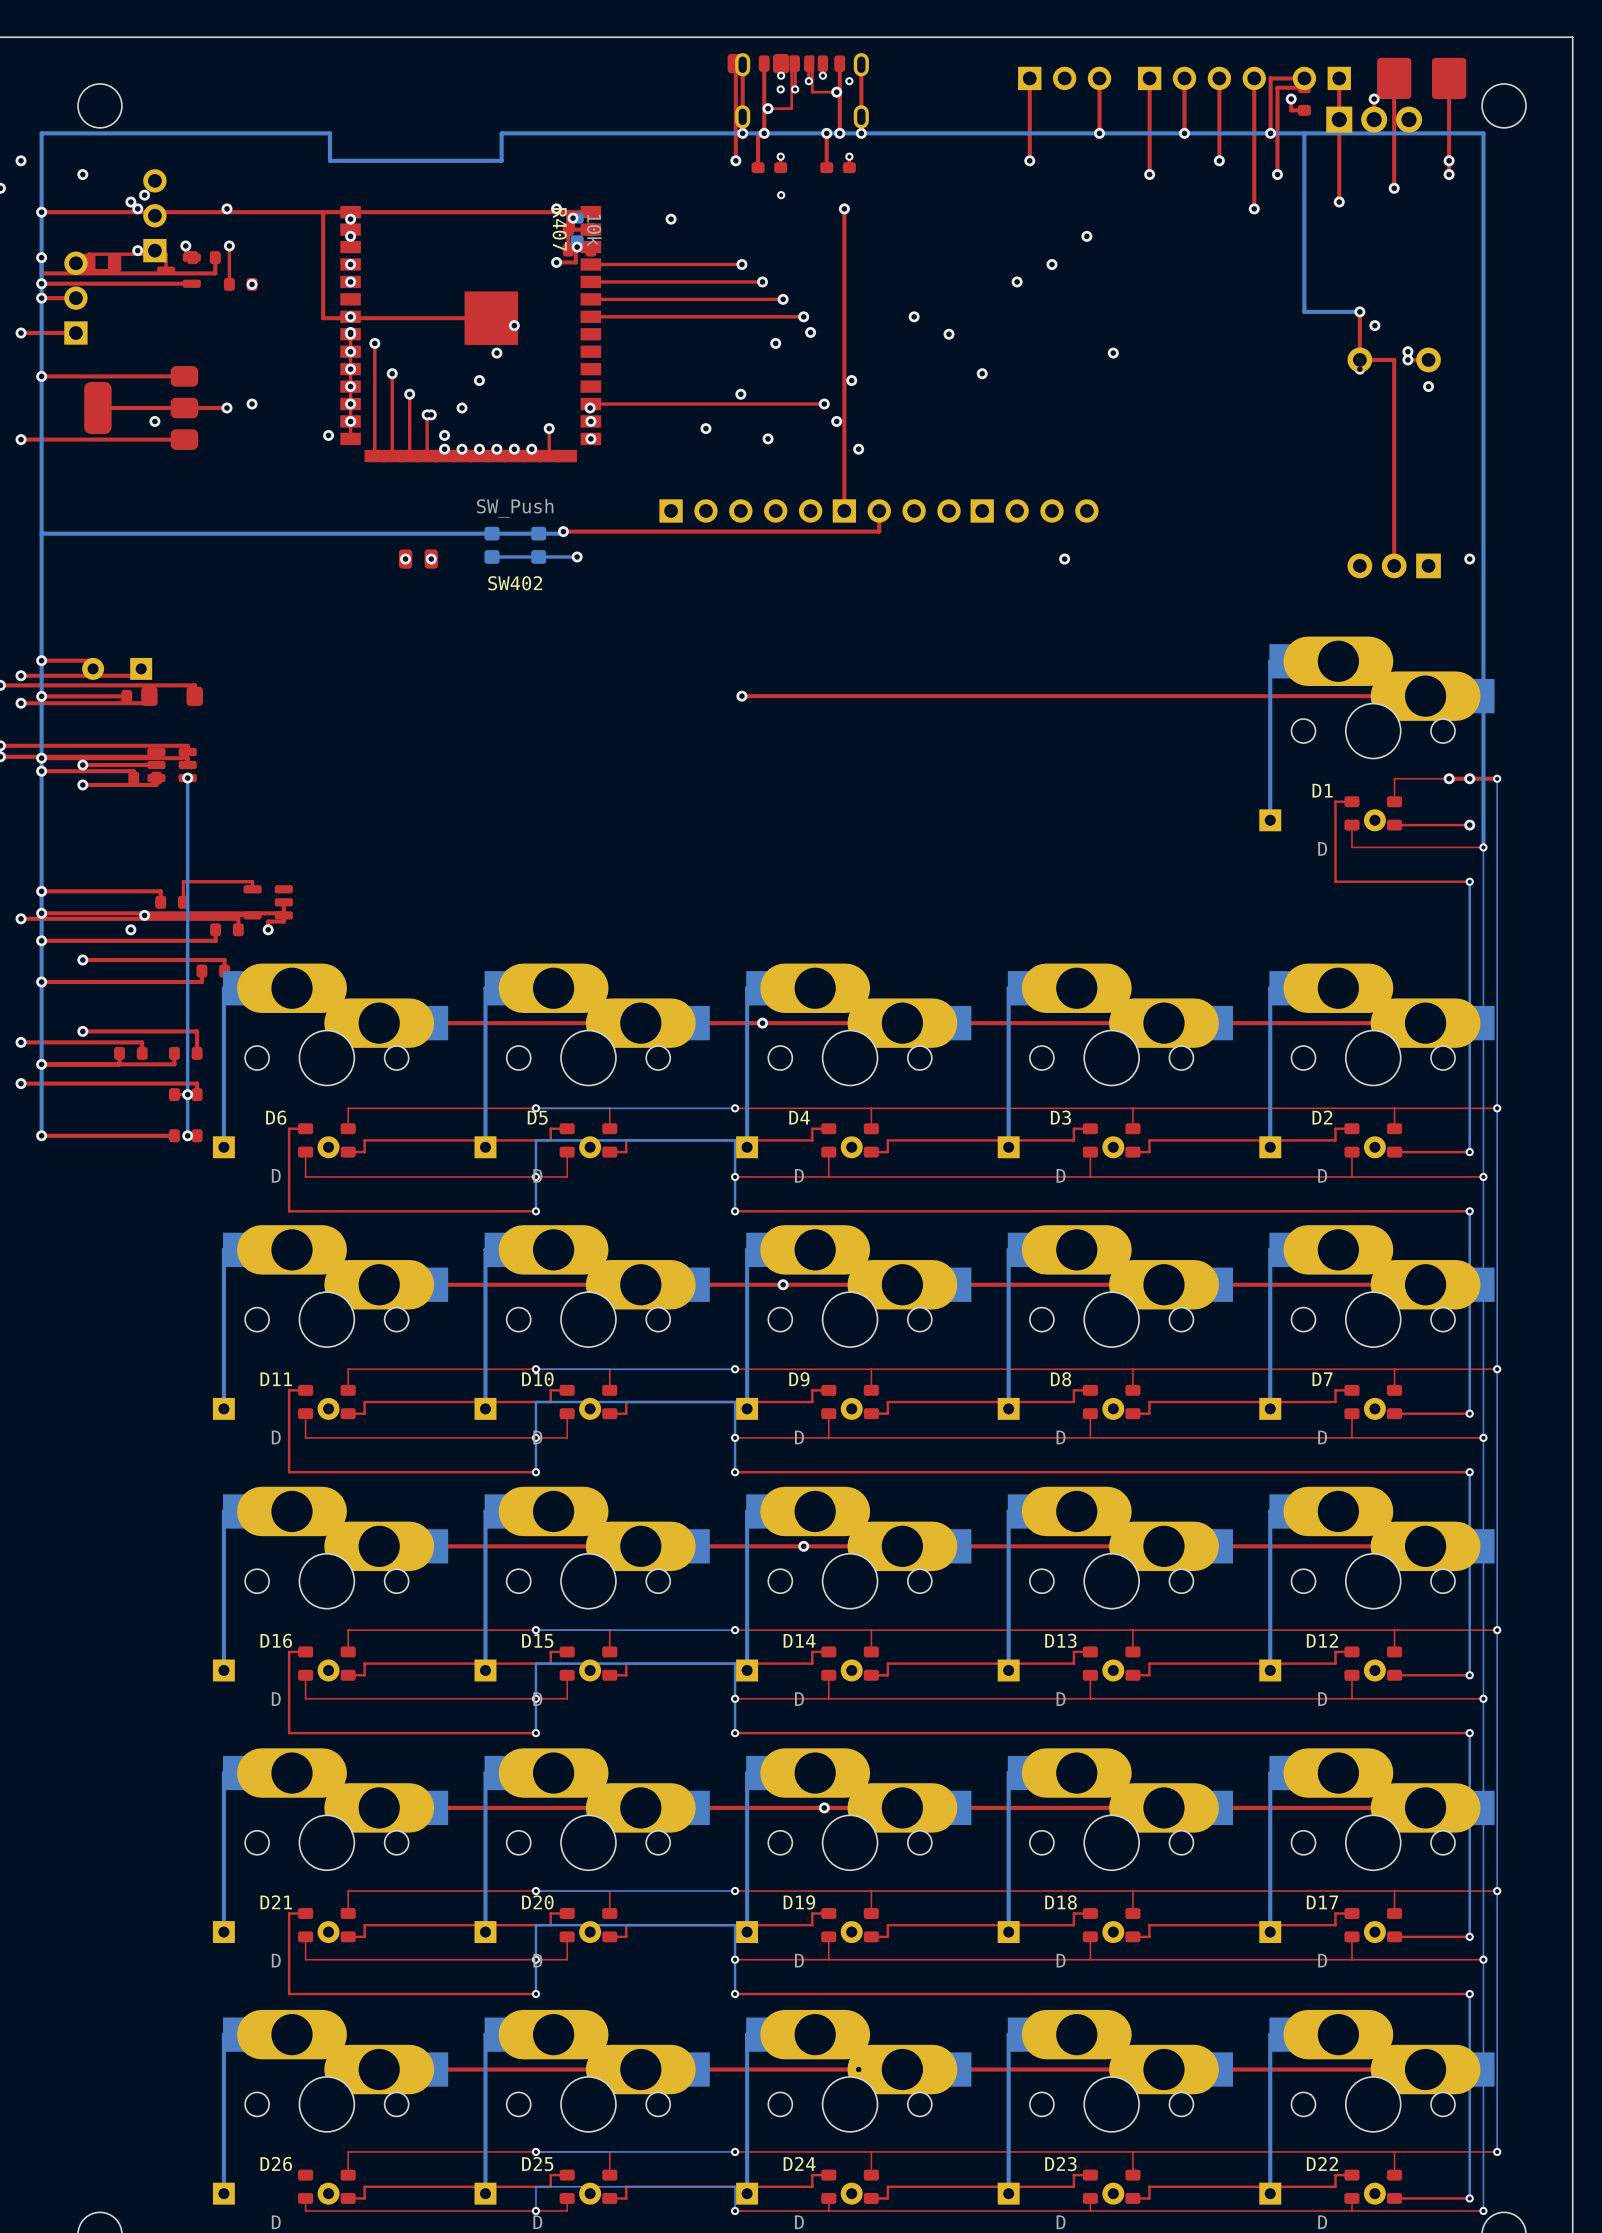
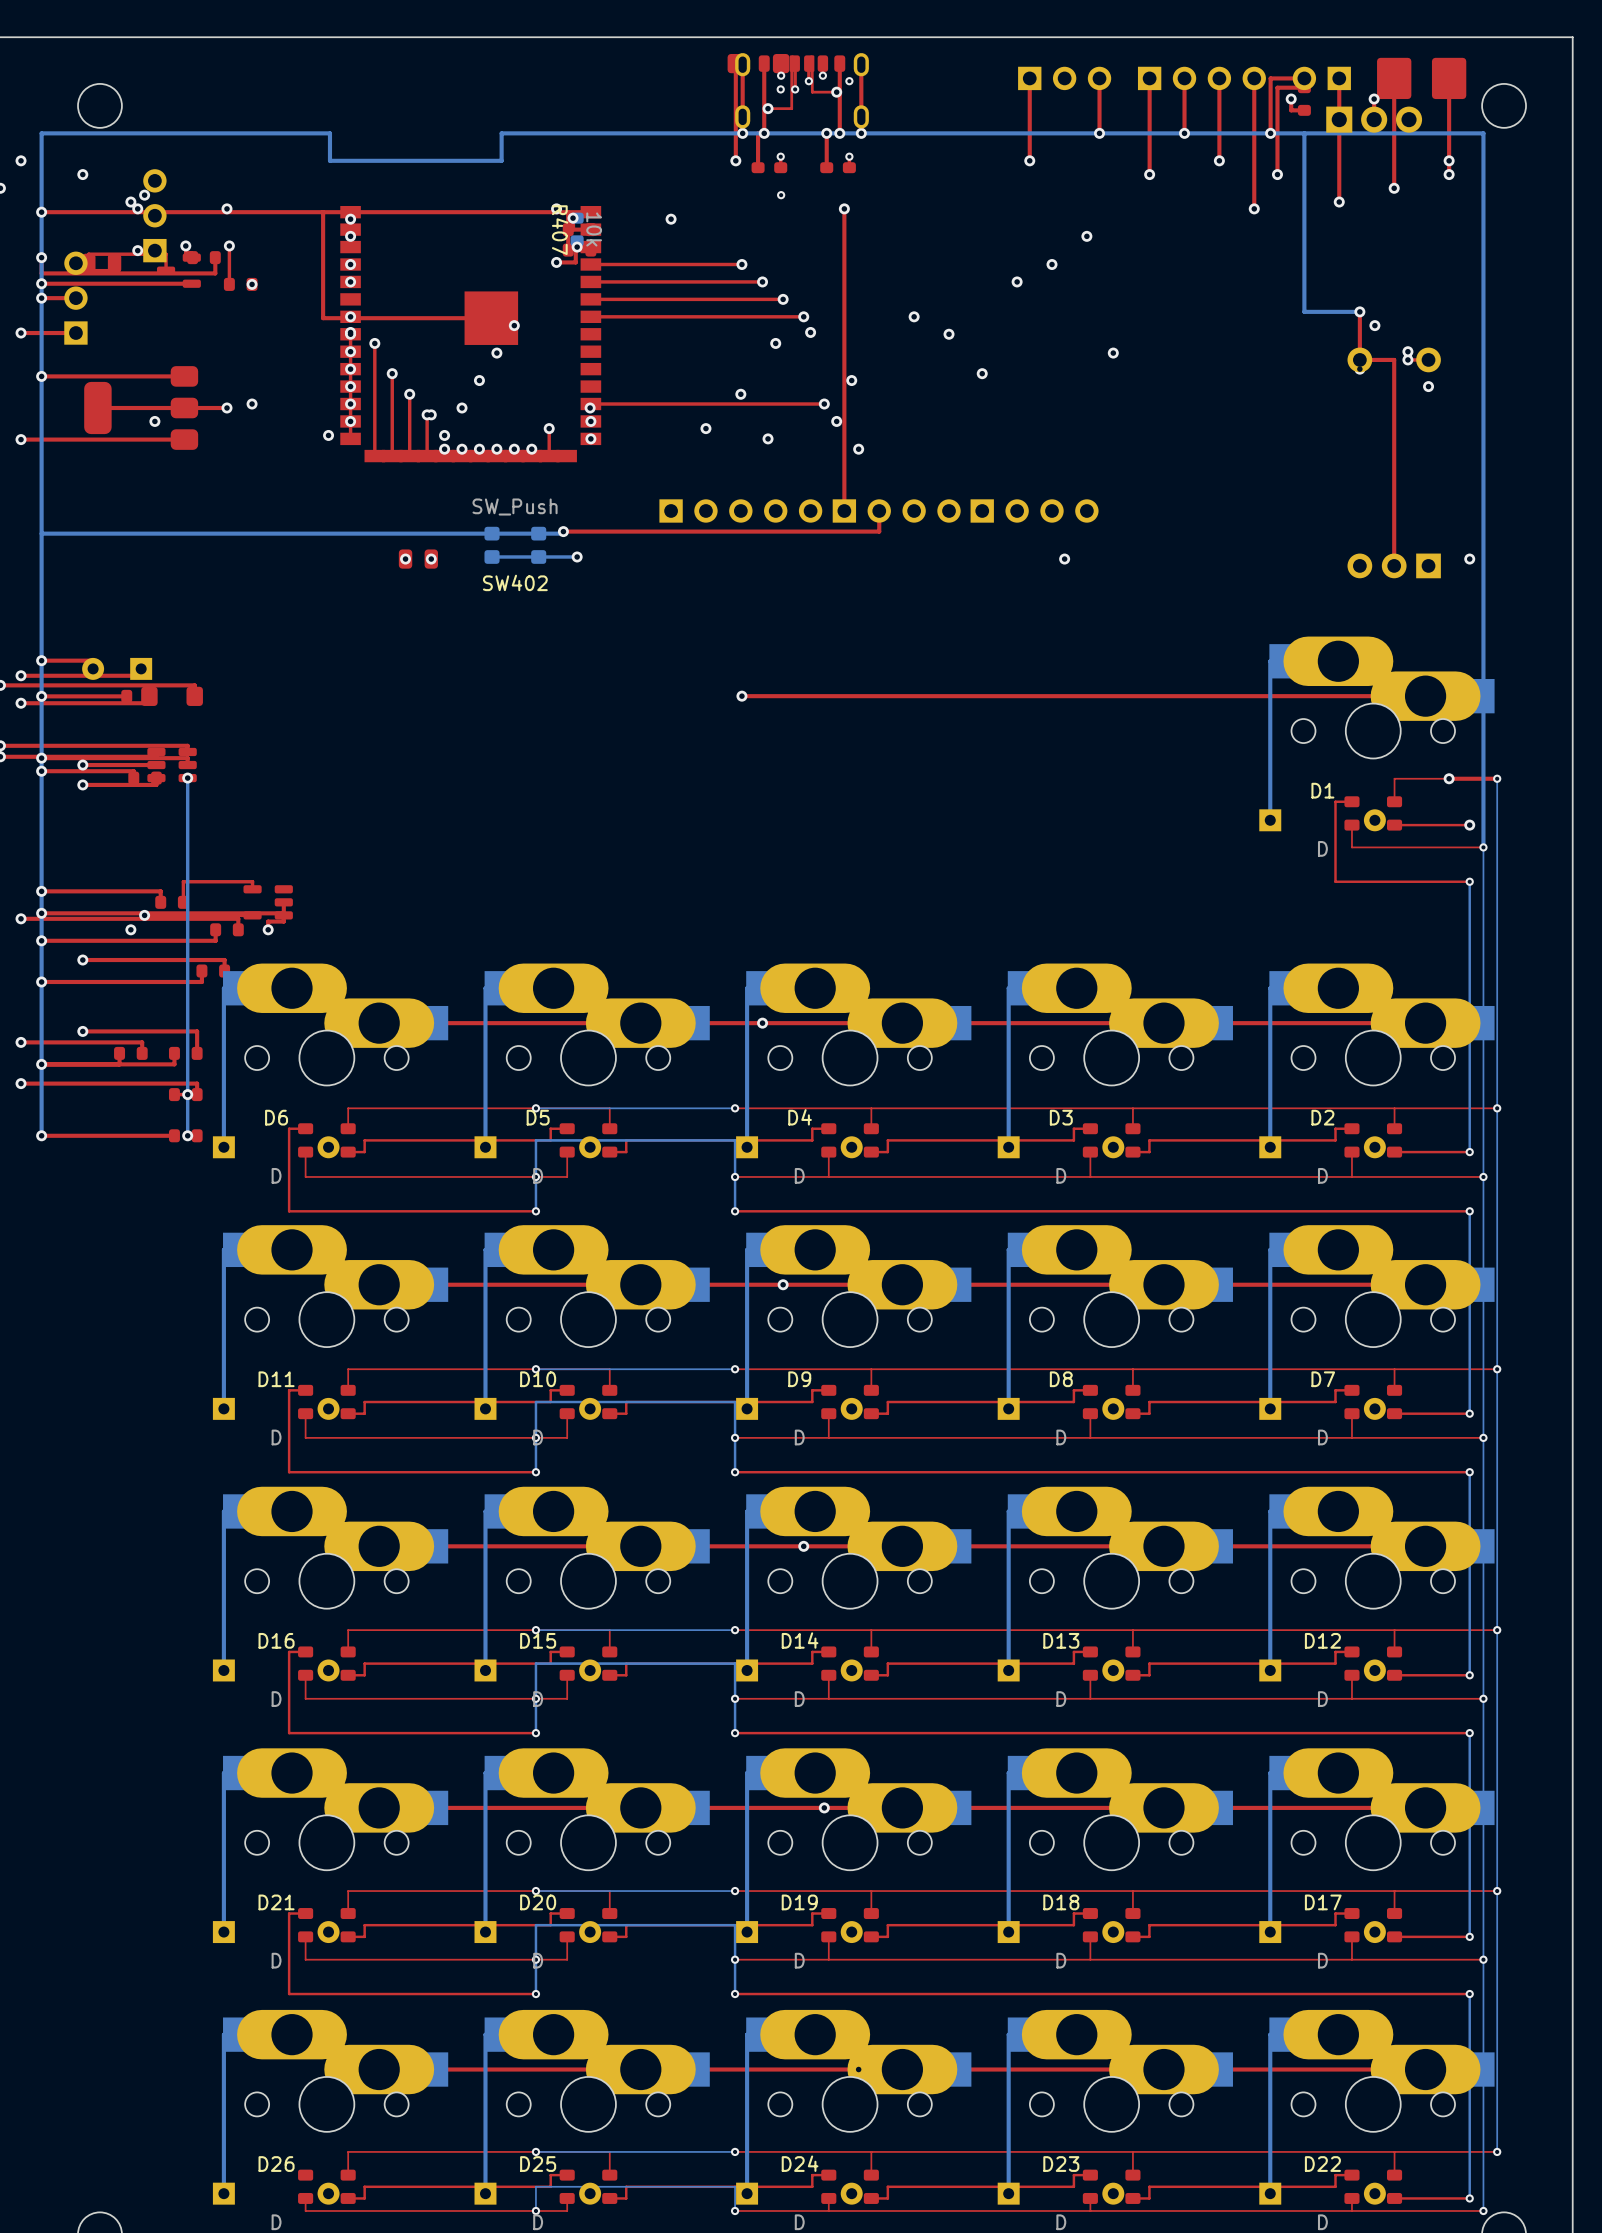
via: (1469, 778) -> none

